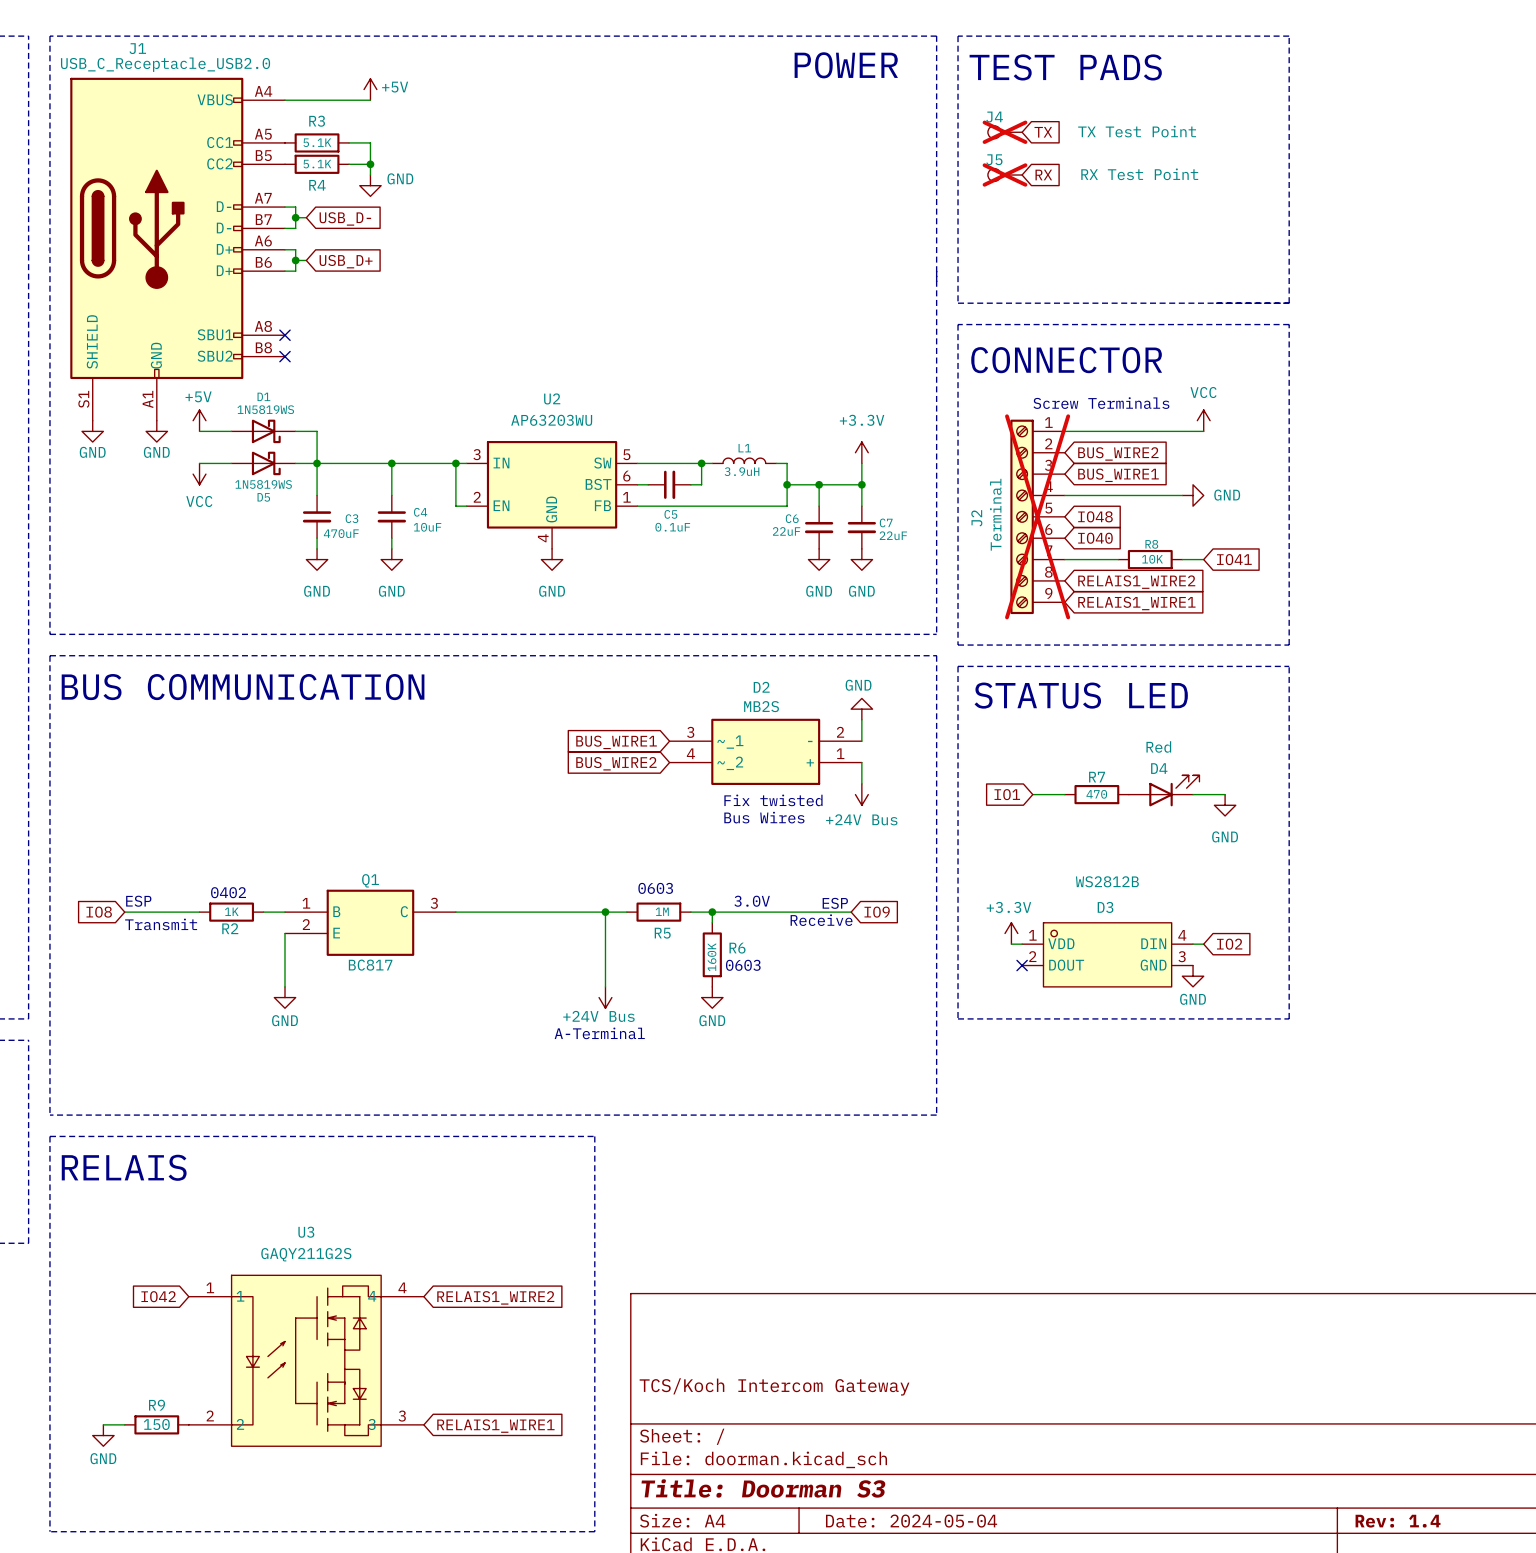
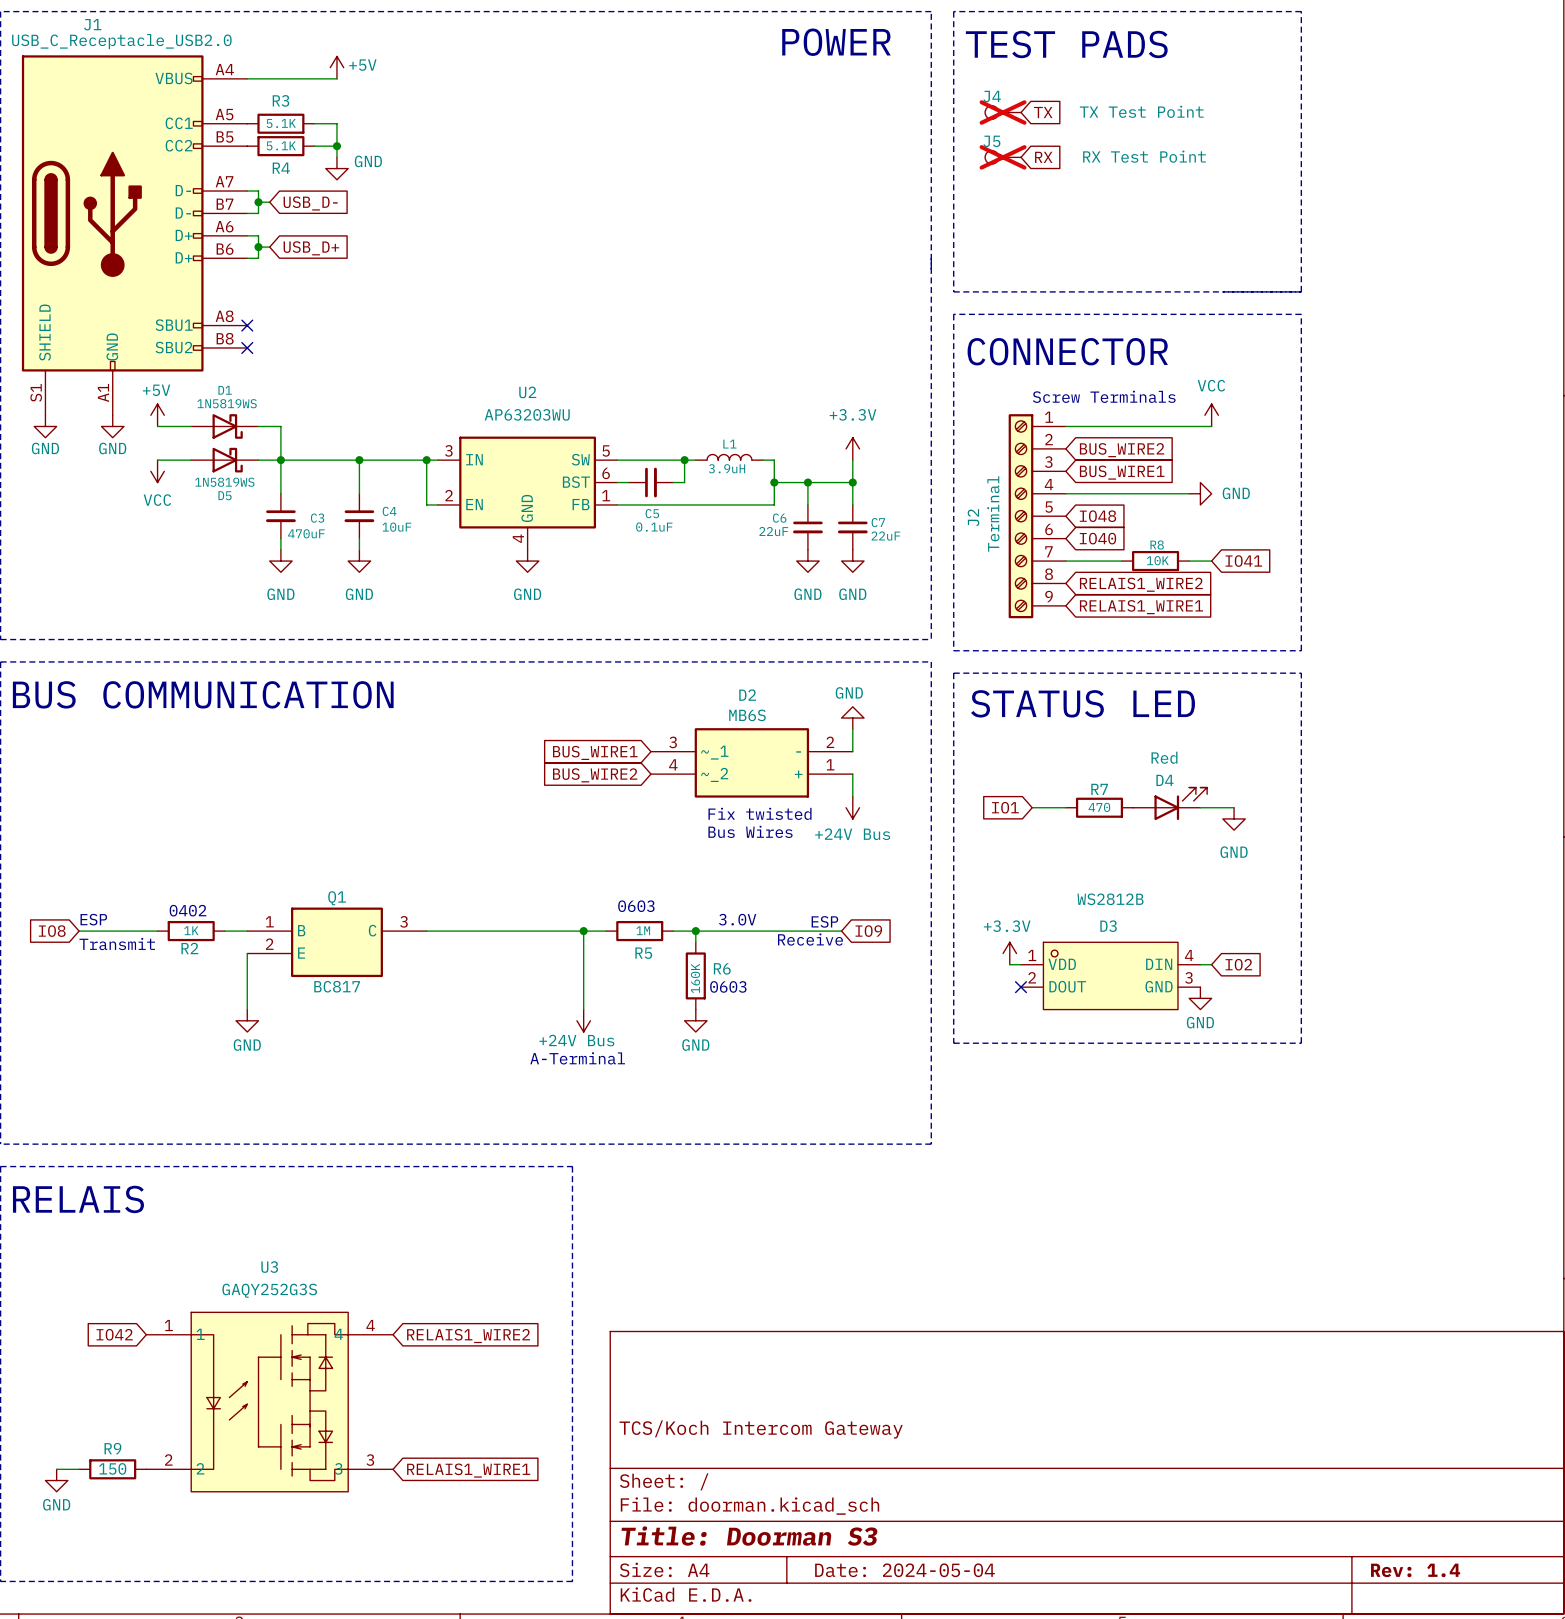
J2 do-not-place cross: (1037, 516) -> none
D2 value: MB2S (761, 706) -> MB6S (747, 715)
U3 value: GAQY211G2S (306, 1254) -> GAQY252G3S (269, 1290)

